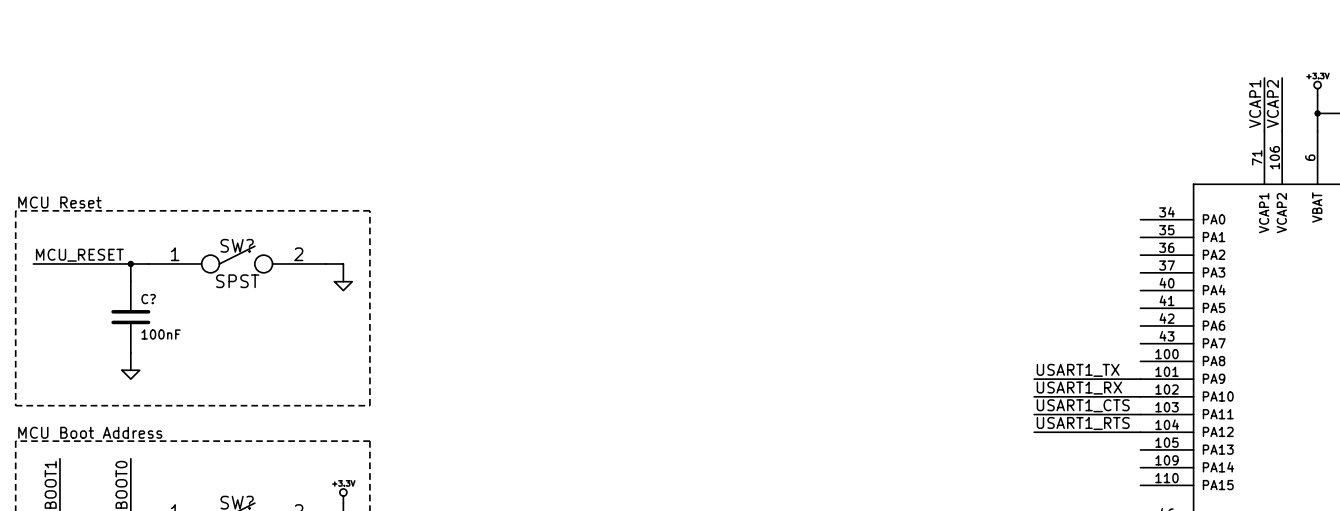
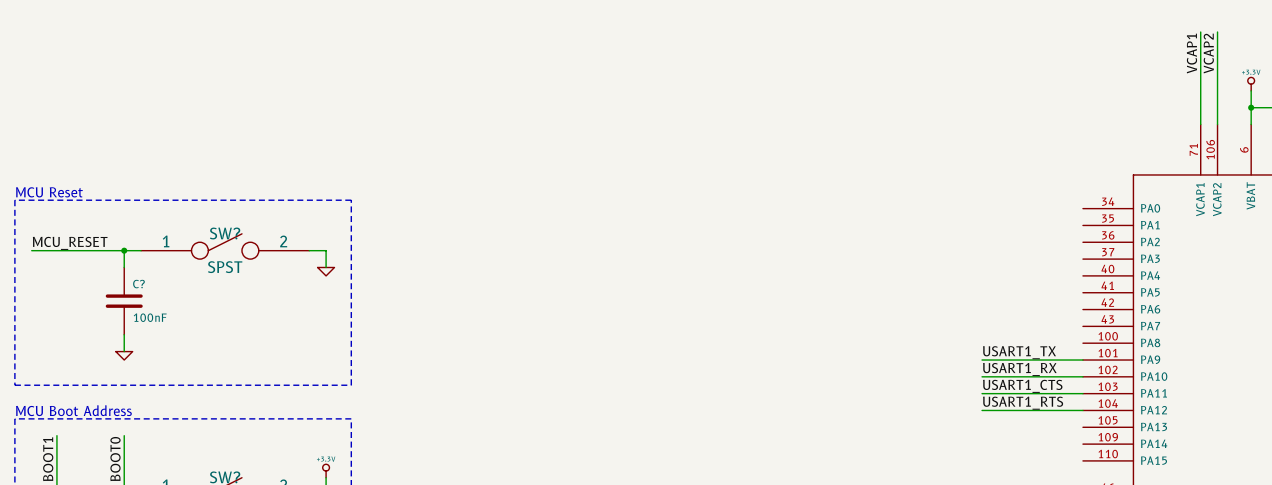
wire: none -> (1200, 32) (1200, 74)
wire: none -> (1217, 32) (1217, 74)
label position: VCAP1 (1255, 104) -> VCAP1 (1191, 53)
label position: VCAP2 (1272, 104) -> VCAP2 (1208, 53)

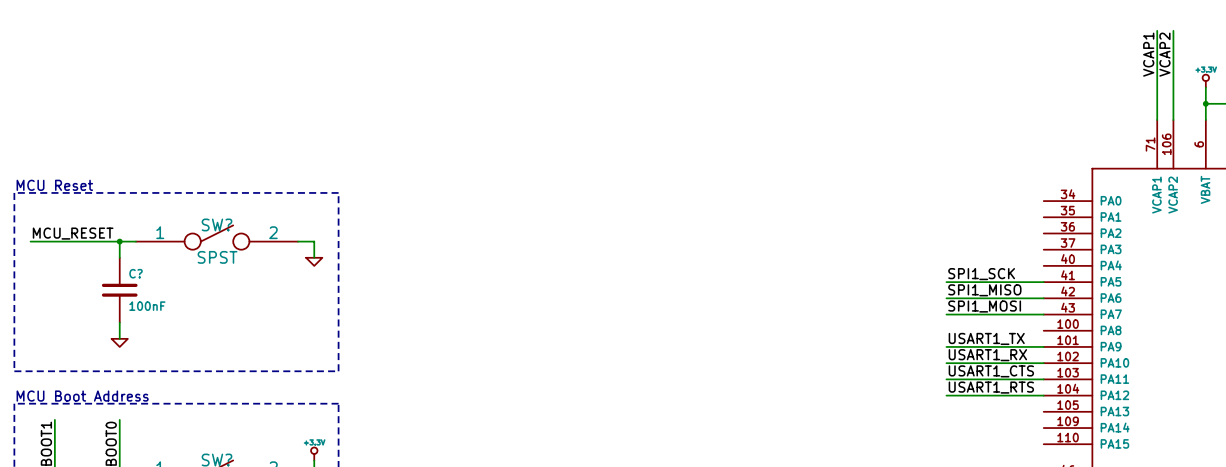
label: none -> SPI1_SCK (981, 274)
wire: none -> (946, 282) (1043, 282)
label: none -> SPI1_MISO (984, 290)
wire: none -> (946, 298) (1043, 298)
label: none -> SPI1_MOSI (984, 306)
wire: none -> (946, 314) (1043, 314)

